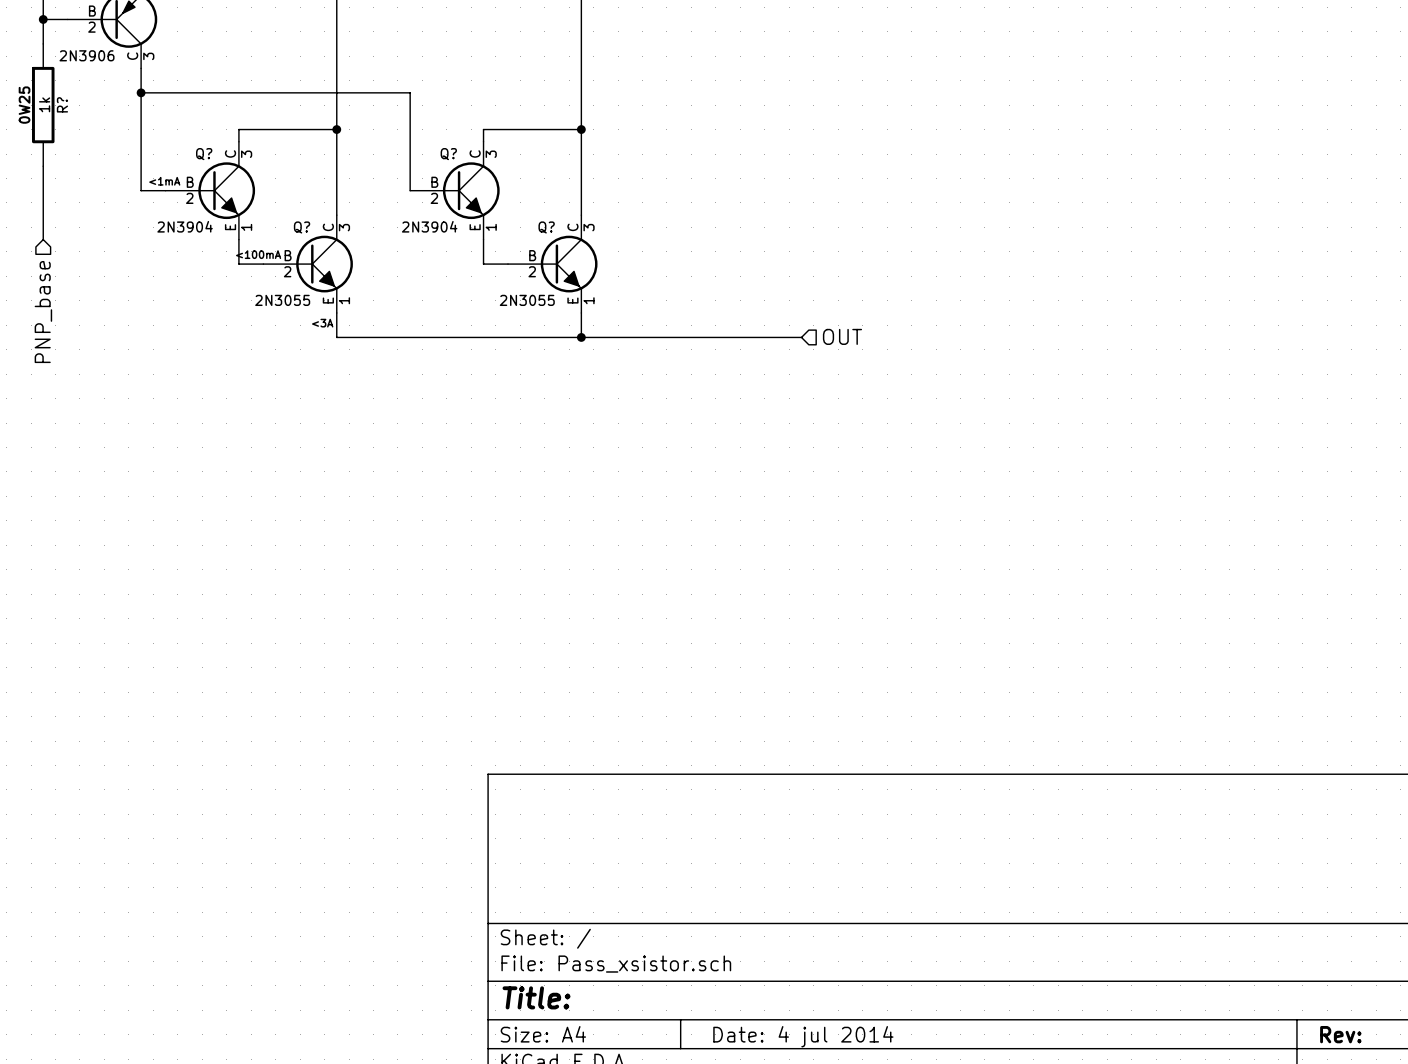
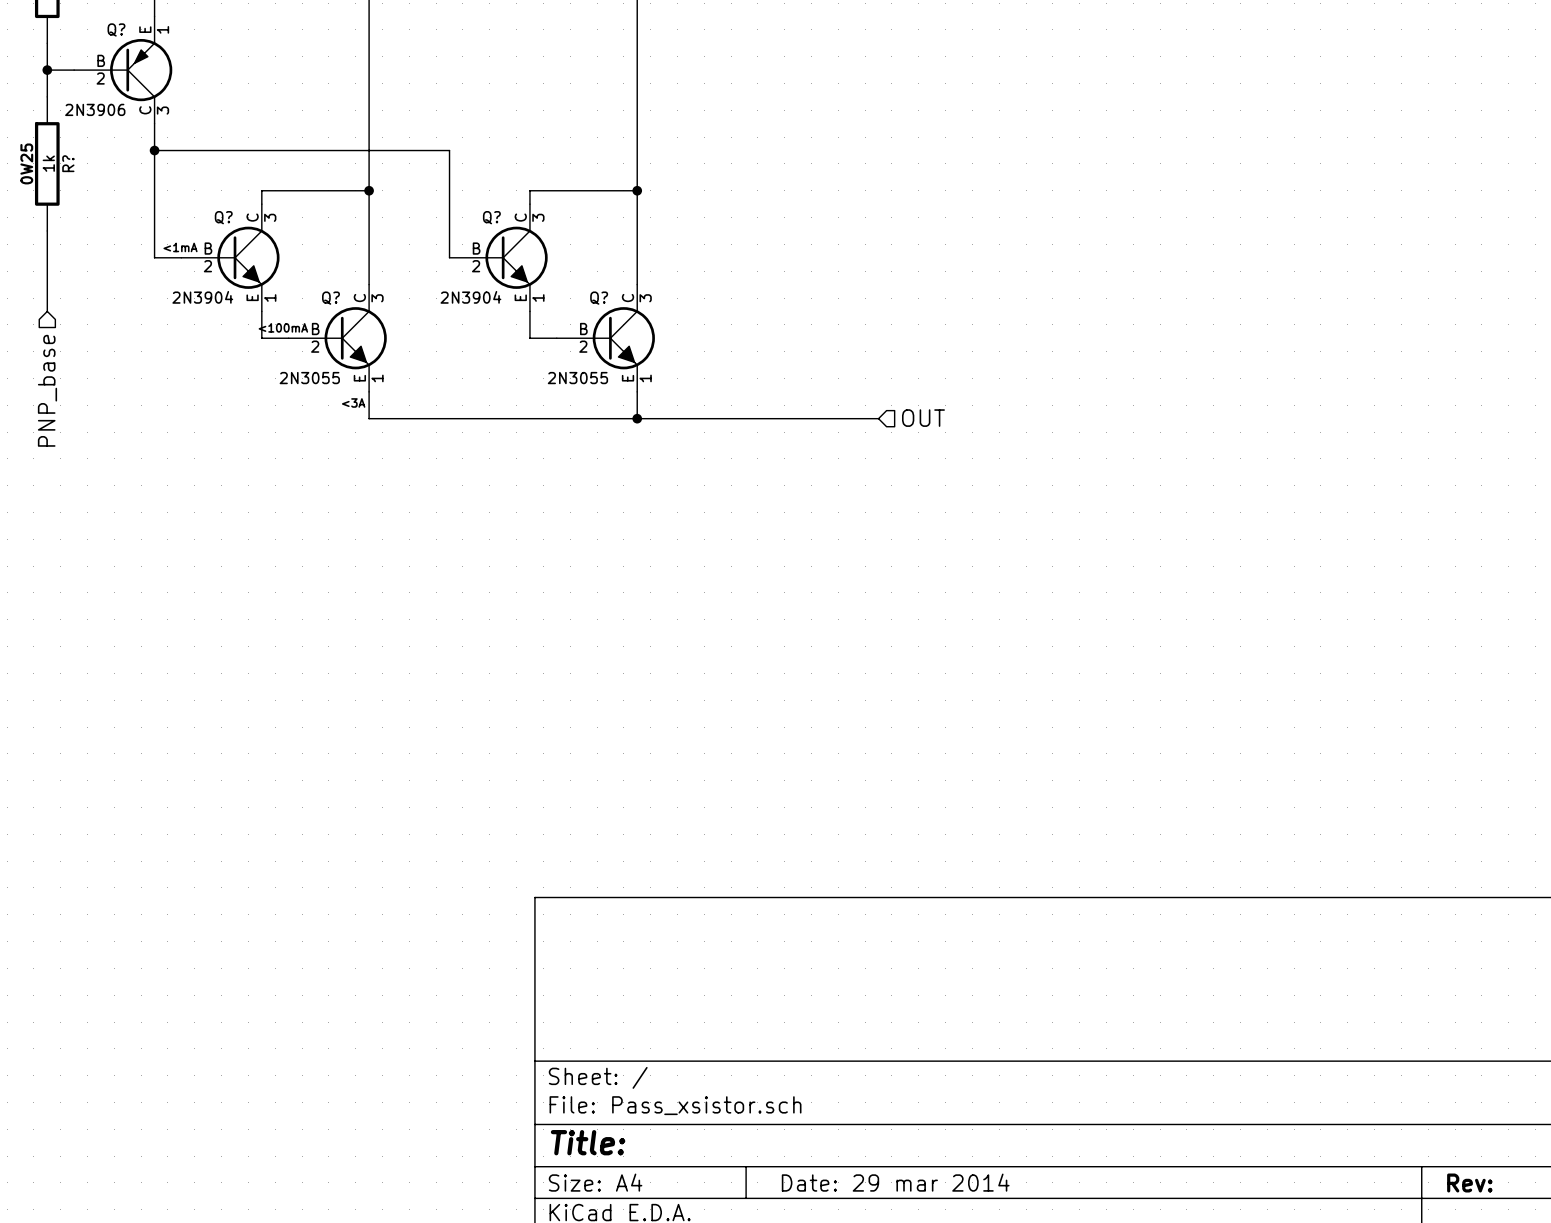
title block: Date: 4 jul 2014 (803, 1036) -> Date: 29 mar 2014 (895, 1182)

